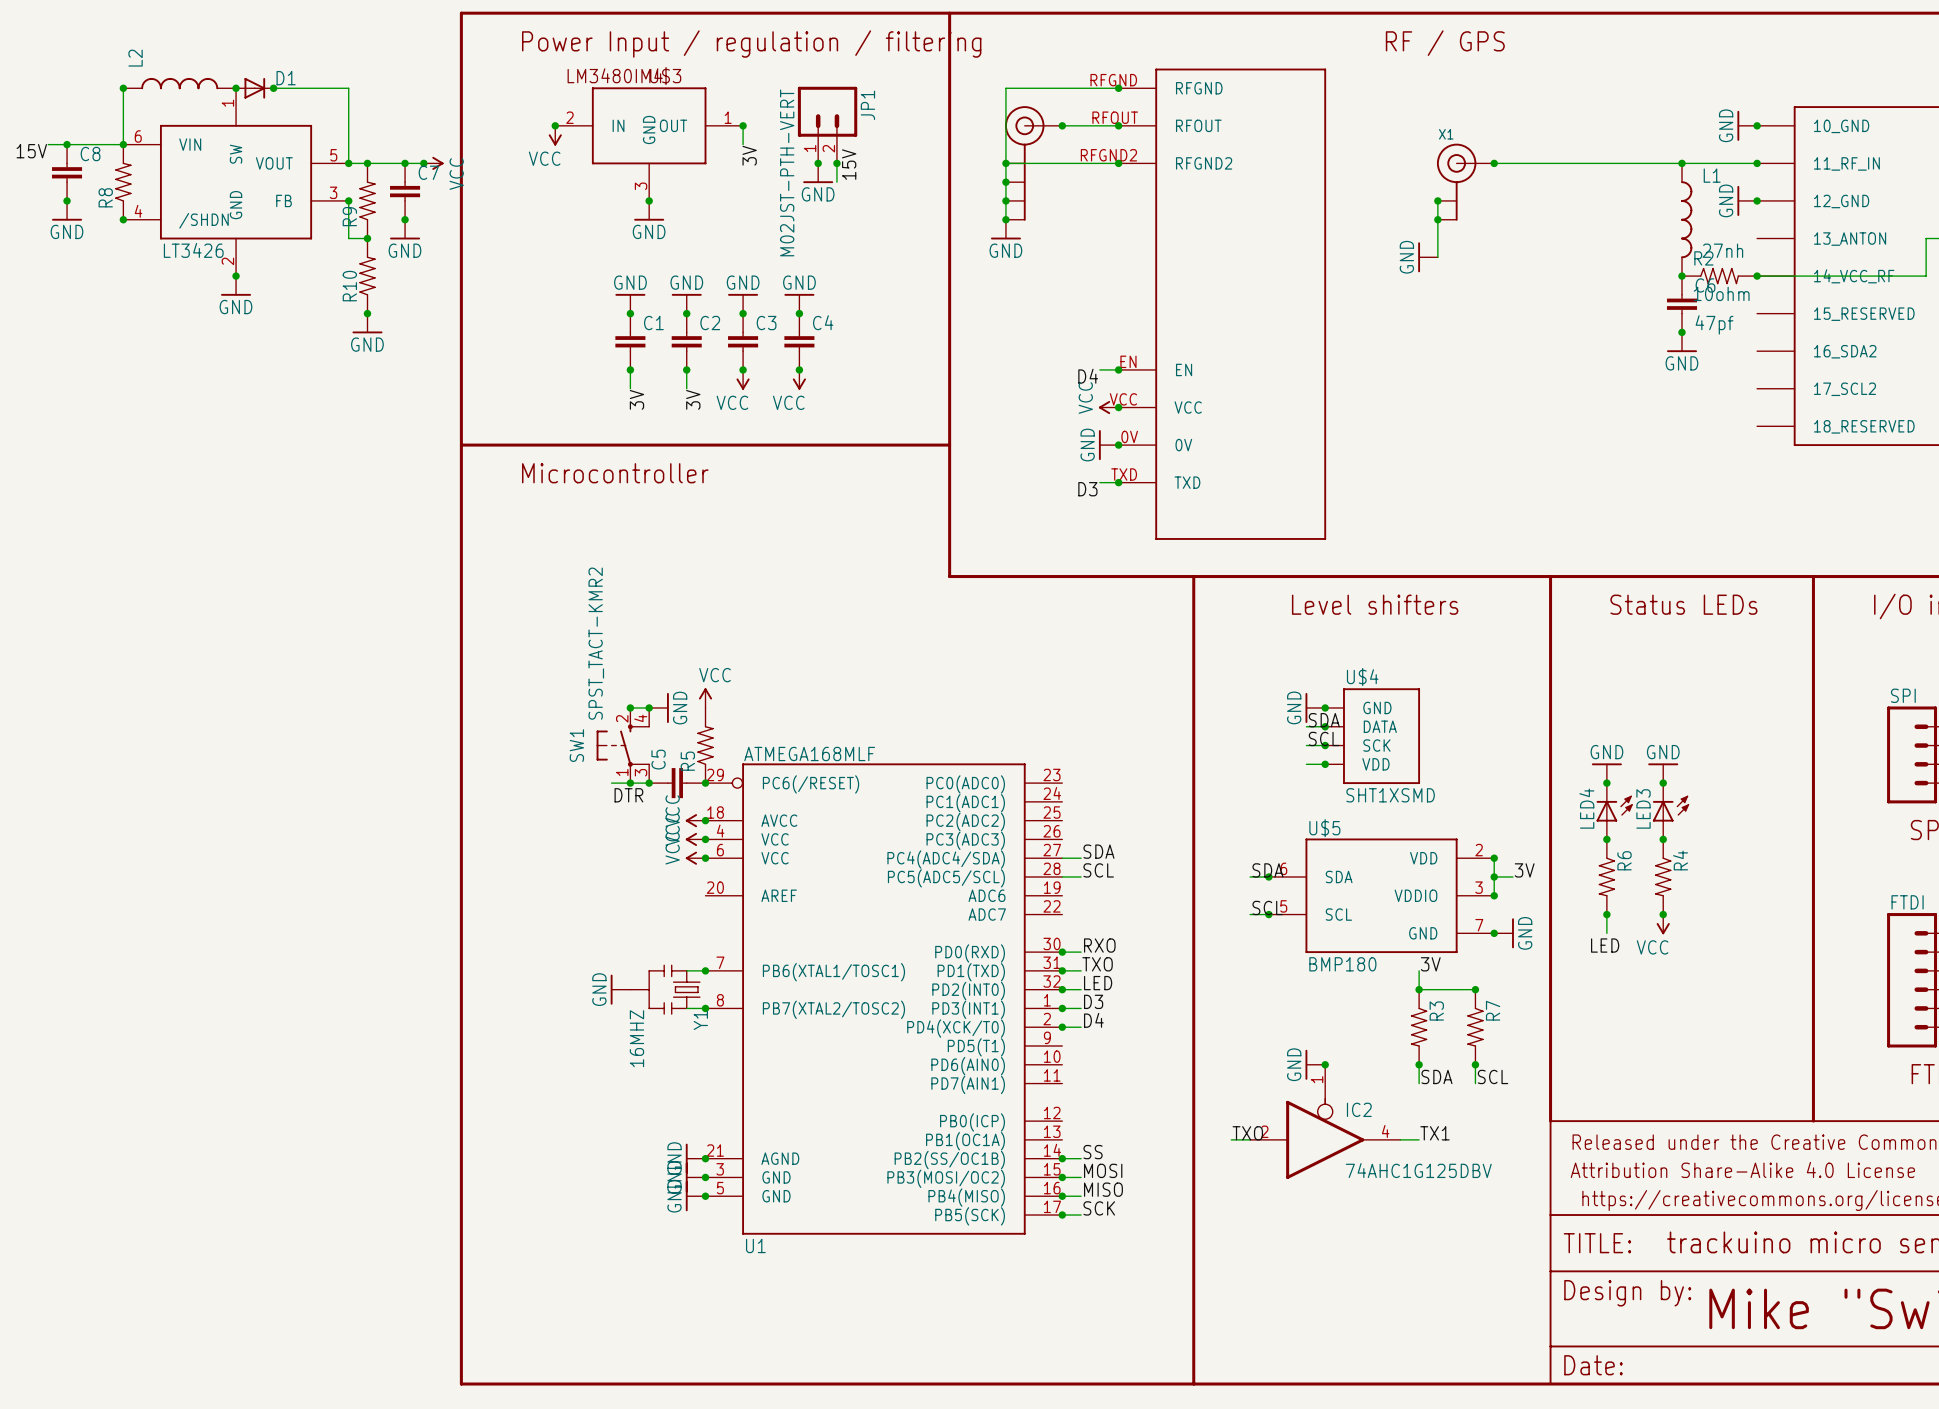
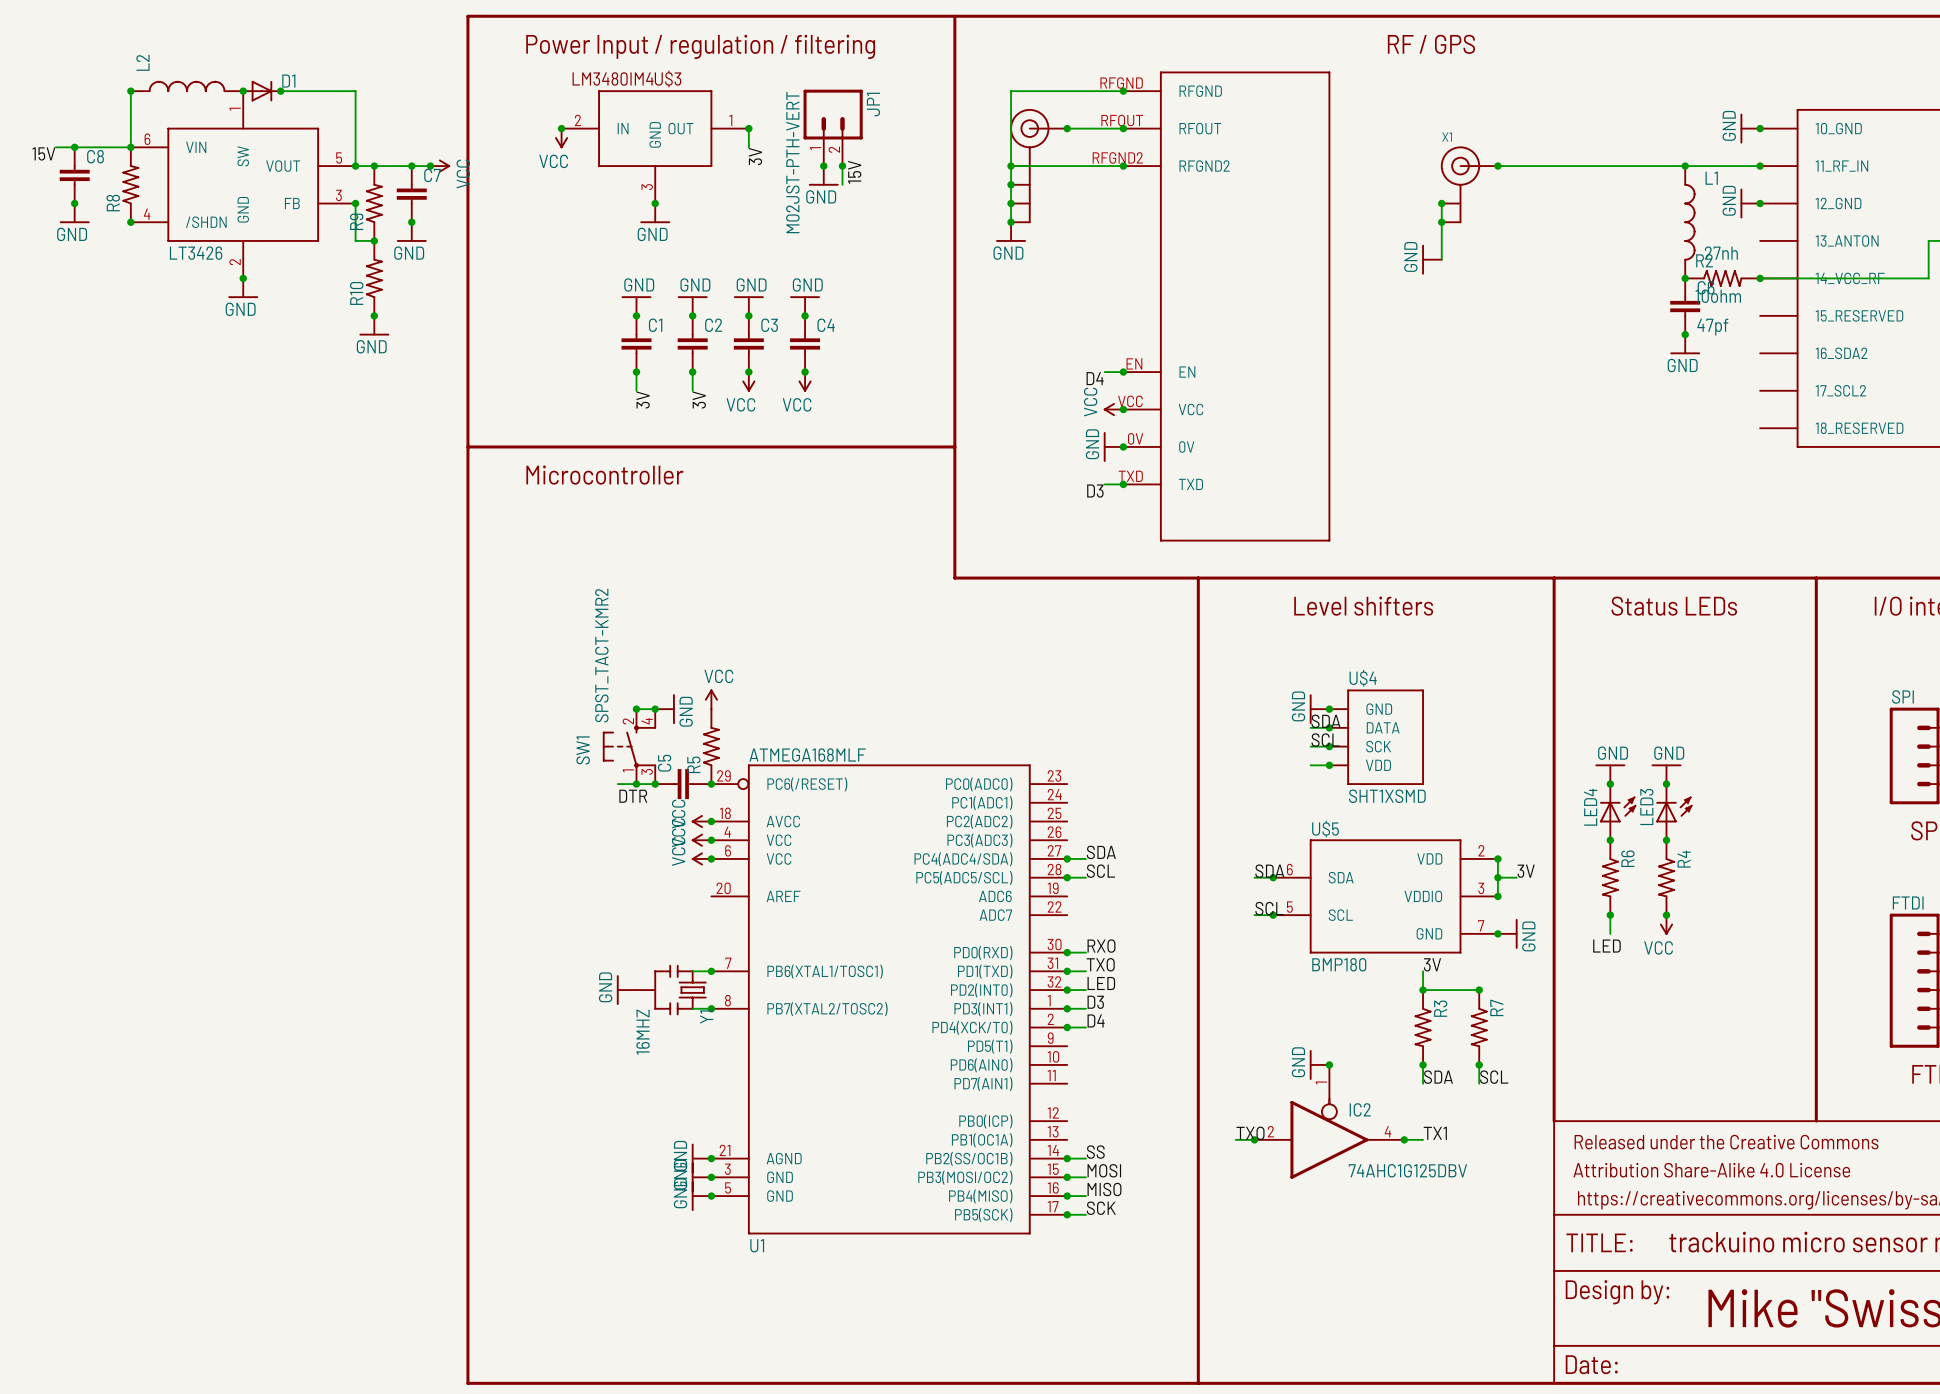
junction: none -> (1067, 858)
junction: none -> (1067, 877)
junction: none -> (1254, 1139)
junction: none -> (1404, 1139)

